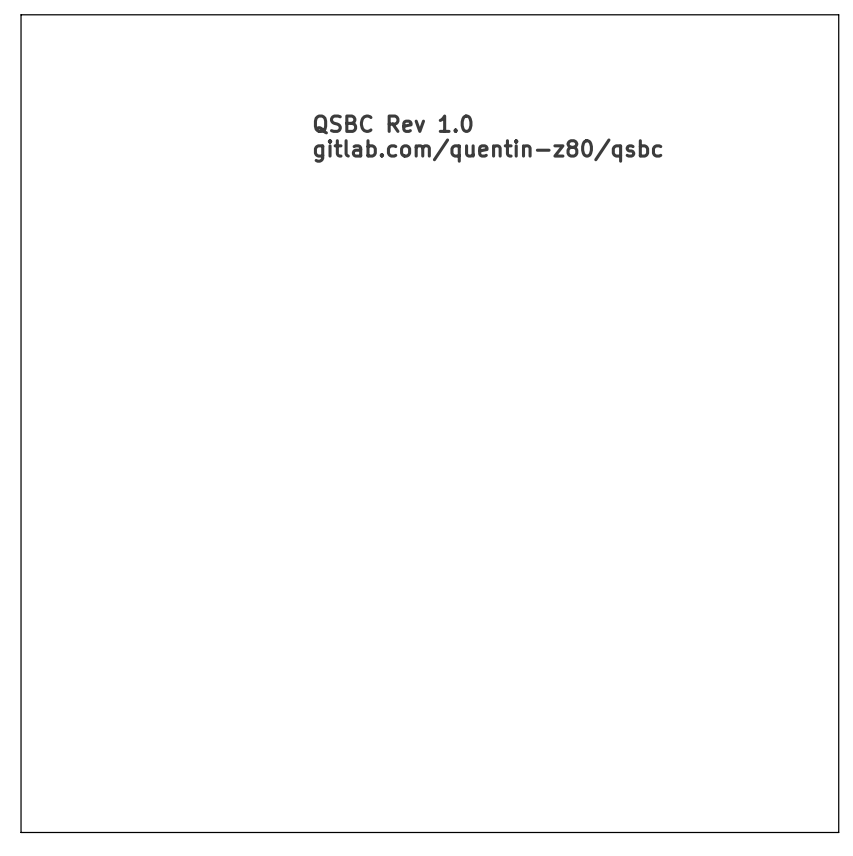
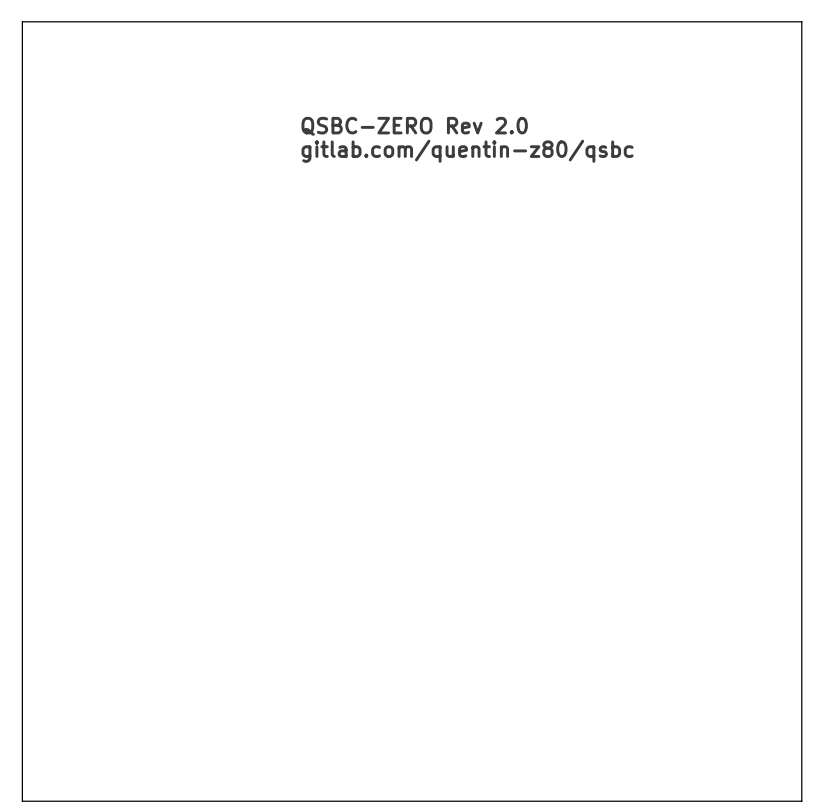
text: QSBC Rev 1.0 (393, 124) -> QSBC-ZERO Rev 2.0 (414, 126)

